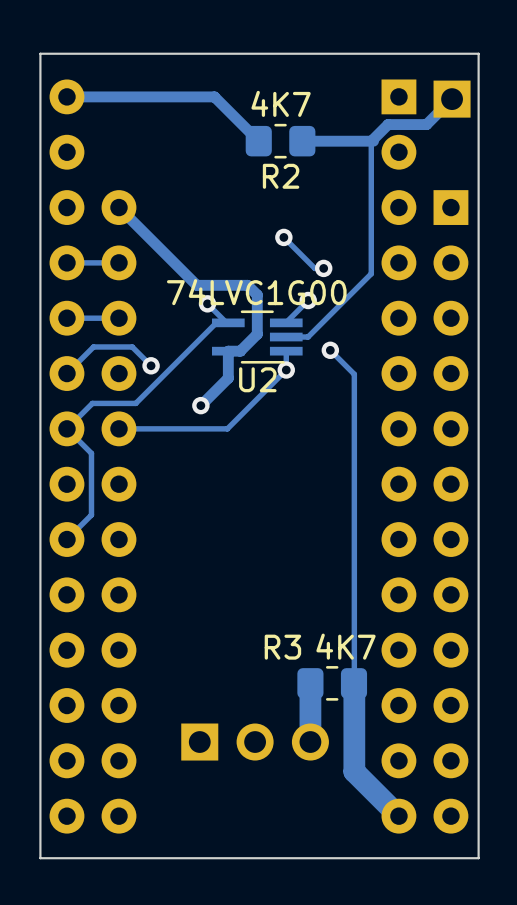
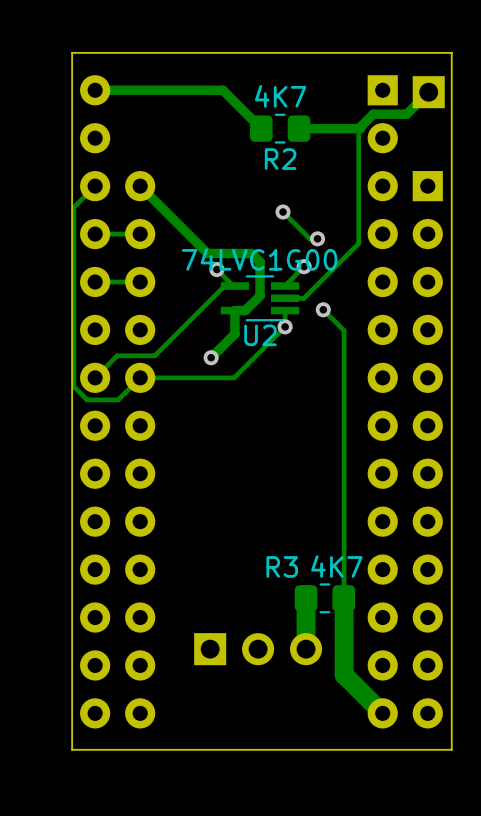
track: none -> (95, 186) (73, 207) (73, 386) (87, 399) (118, 399) (140, 377)
track: (151, 365) (132, 346) (93, 346) (66, 373) -> none
via: (151, 365) -> none
track: (66, 428) (91, 453) (91, 515) (66, 539) -> none

